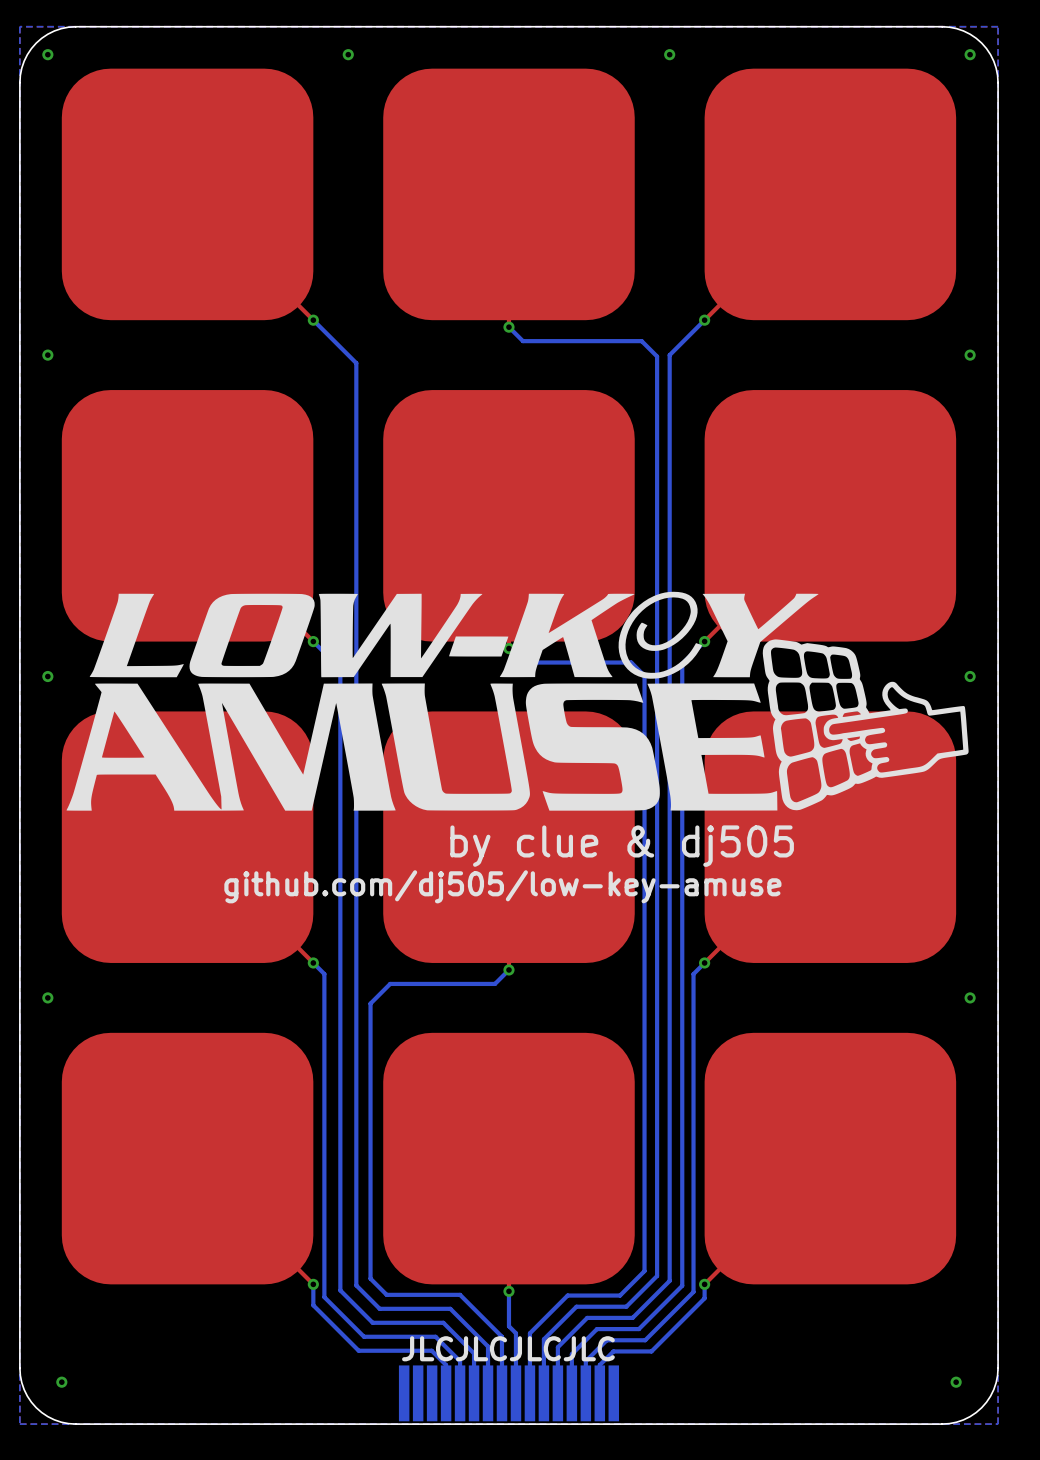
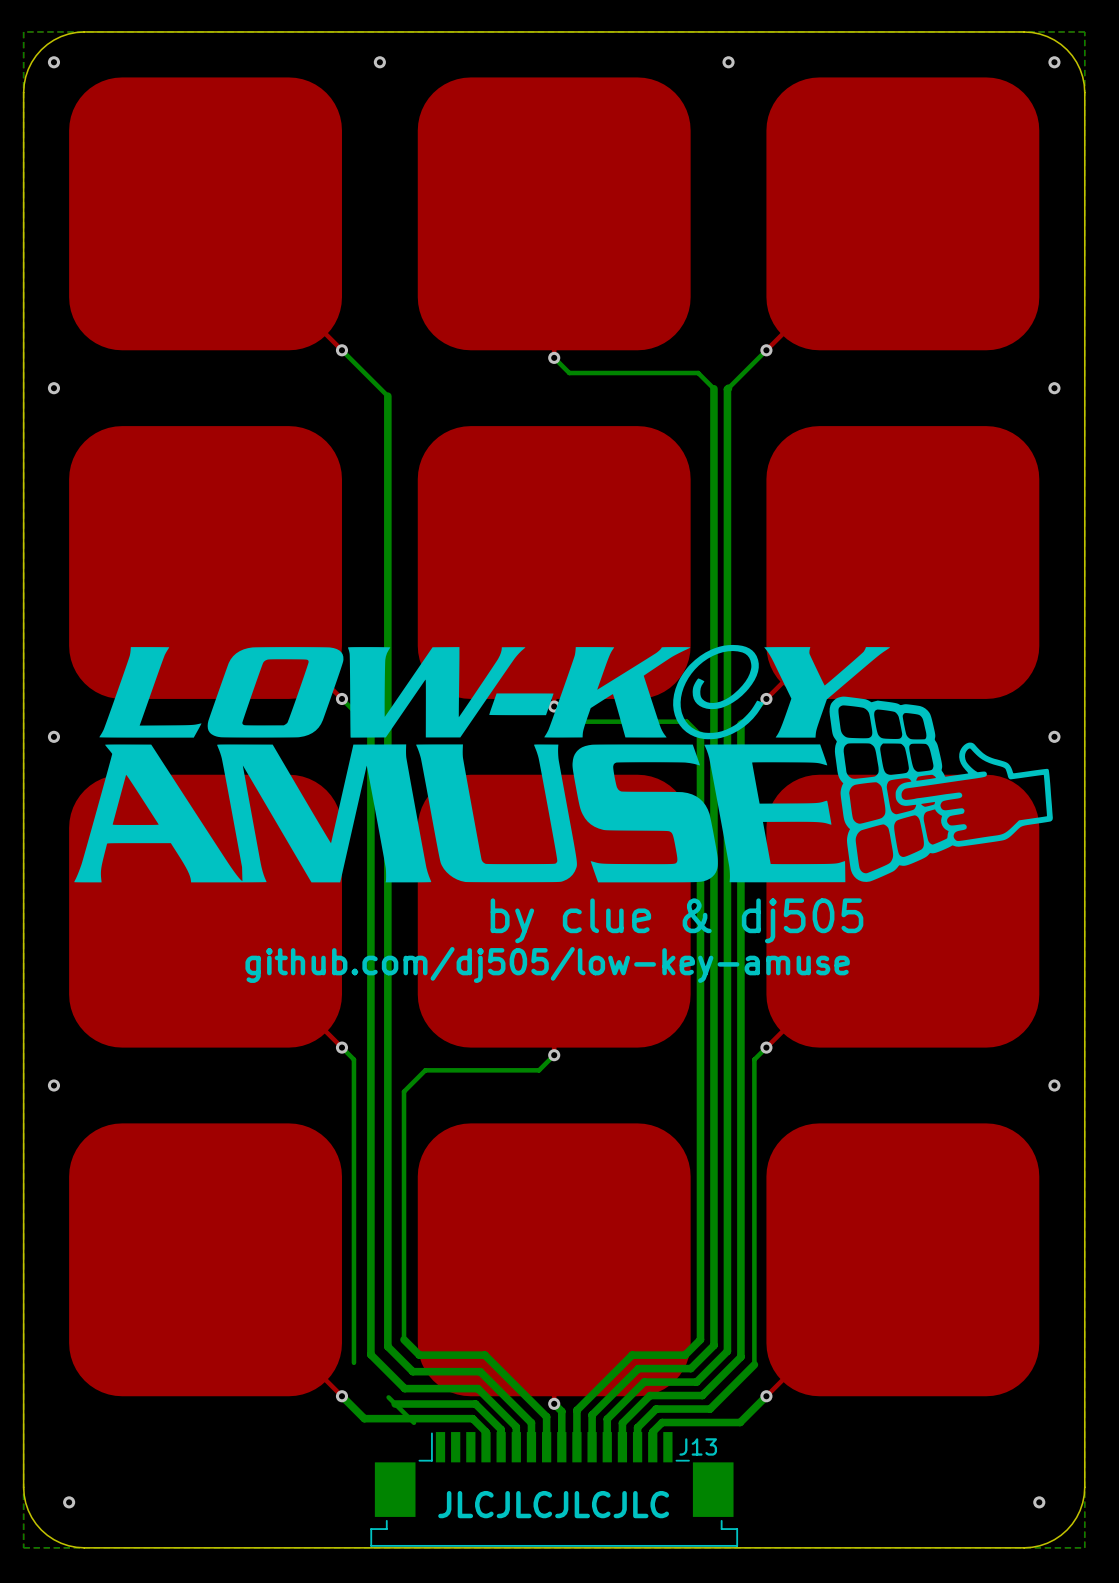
bottom track: (656, 355) (657, 1275) (626, 1306) (576, 1306) (543, 1339) (543, 1393) -> (713, 388) (713, 1345) (690, 1368) (638, 1368) (592, 1414) (592, 1447)
bottom track: (669, 355) (669, 1280) (632, 1317) (587, 1317) (557, 1347) (557, 1393) -> (728, 388) (727, 1351) (696, 1382) (644, 1382) (607, 1419) (607, 1447)
bottom track: (355, 362) (356, 1285) -> (387, 396) (387, 1346) (412, 1371) (480, 1371) (531, 1422) (531, 1447)
bottom track: (682, 663) (682, 1285) (638, 1329) (597, 1329) (571, 1354) (571, 1393) -> (742, 723) (740, 1357) (702, 1395) (650, 1395) (622, 1423) (622, 1447)
bottom track: (340, 668) (340, 1290) (372, 1322) (443, 1322) (474, 1353) (474, 1393) -> (370, 727) (370, 1354) (404, 1388) (477, 1388) (516, 1426) (516, 1447)
bottom track: (643, 675) (644, 1271) (620, 1295) (567, 1295) (529, 1333) (529, 1393) -> (700, 735) (700, 1339) (685, 1355) (632, 1355) (576, 1410) (576, 1447)
bottom track: (370, 1232) (370, 1278) (386, 1294) (460, 1294) (501, 1336) (501, 1393) -> (404, 1339) (419, 1355) (484, 1355) (546, 1416) (546, 1447)
bottom track: (324, 1253) (324, 1297) (364, 1336) (435, 1336) (460, 1361) (460, 1393) -> none
bottom track: (693, 1255) (693, 1291) (645, 1340) (606, 1340) (585, 1361) (585, 1393) -> (754, 1364) (710, 1409) (656, 1409) (637, 1427) (637, 1447)
bottom track: (313, 1284) (313, 1305) (358, 1350) (431, 1350) (446, 1365) (446, 1393) -> (341, 1396) (364, 1418) (472, 1418) (485, 1431) (485, 1447)
bottom track: (704, 1284) (704, 1298) (651, 1351) (613, 1351) (599, 1365) (599, 1393) -> (766, 1396) (740, 1422) (662, 1422) (652, 1431) (652, 1447)
bottom track: none -> (395, 1404) (475, 1404) (501, 1429) (501, 1447)
bottom track: (508, 1291) (508, 1326) (515, 1333) (515, 1393) -> (554, 1403) (561, 1411) (561, 1447)
bottom track: (379, 1308) (450, 1308) (488, 1346) (488, 1393) -> none
text position: JLCJLCJLCJLC (508, 1348) -> JLCJLCJLCJLC (553, 1504)
J13: none -> (554, 1489)
part: (508, 1393) -> none

